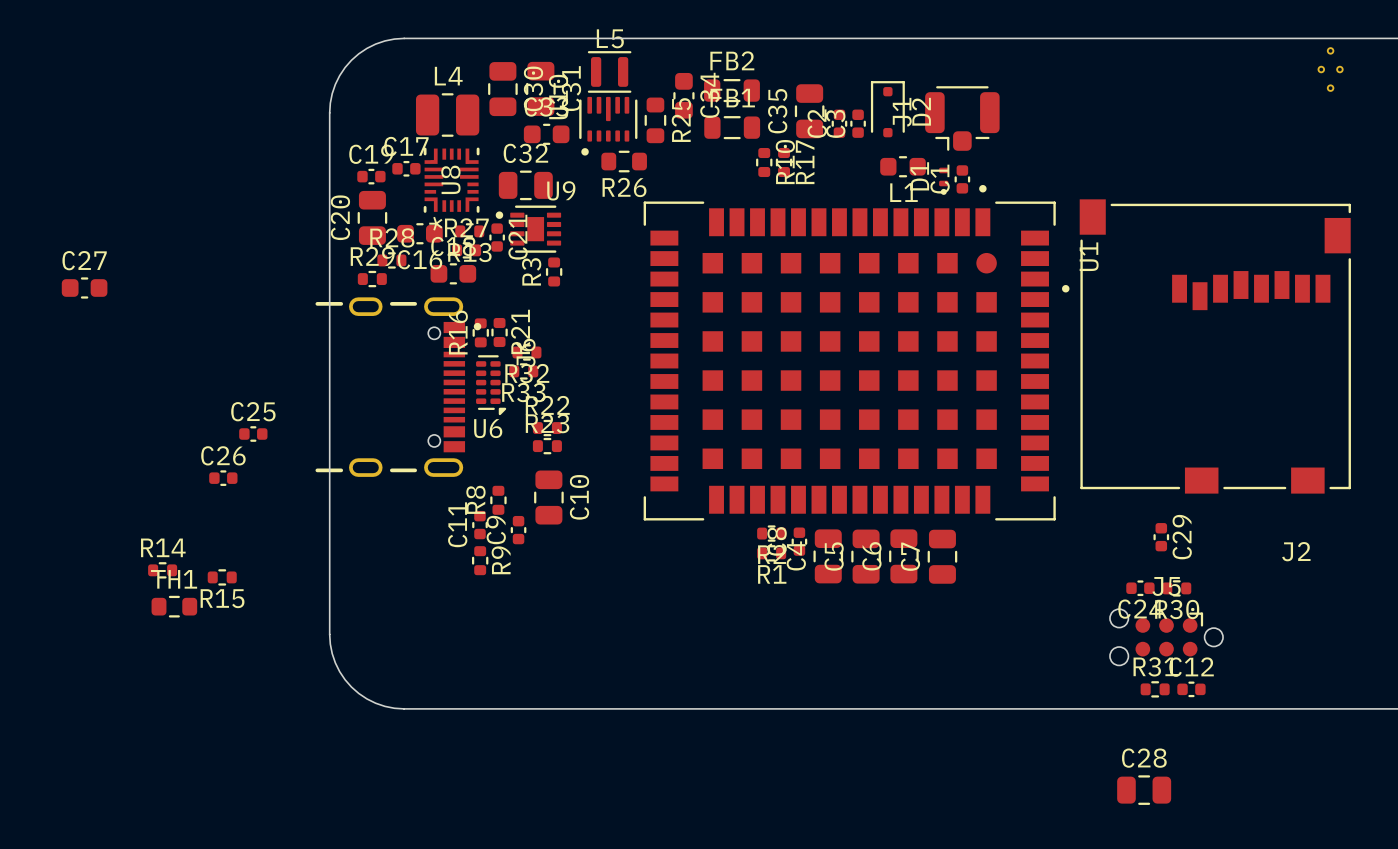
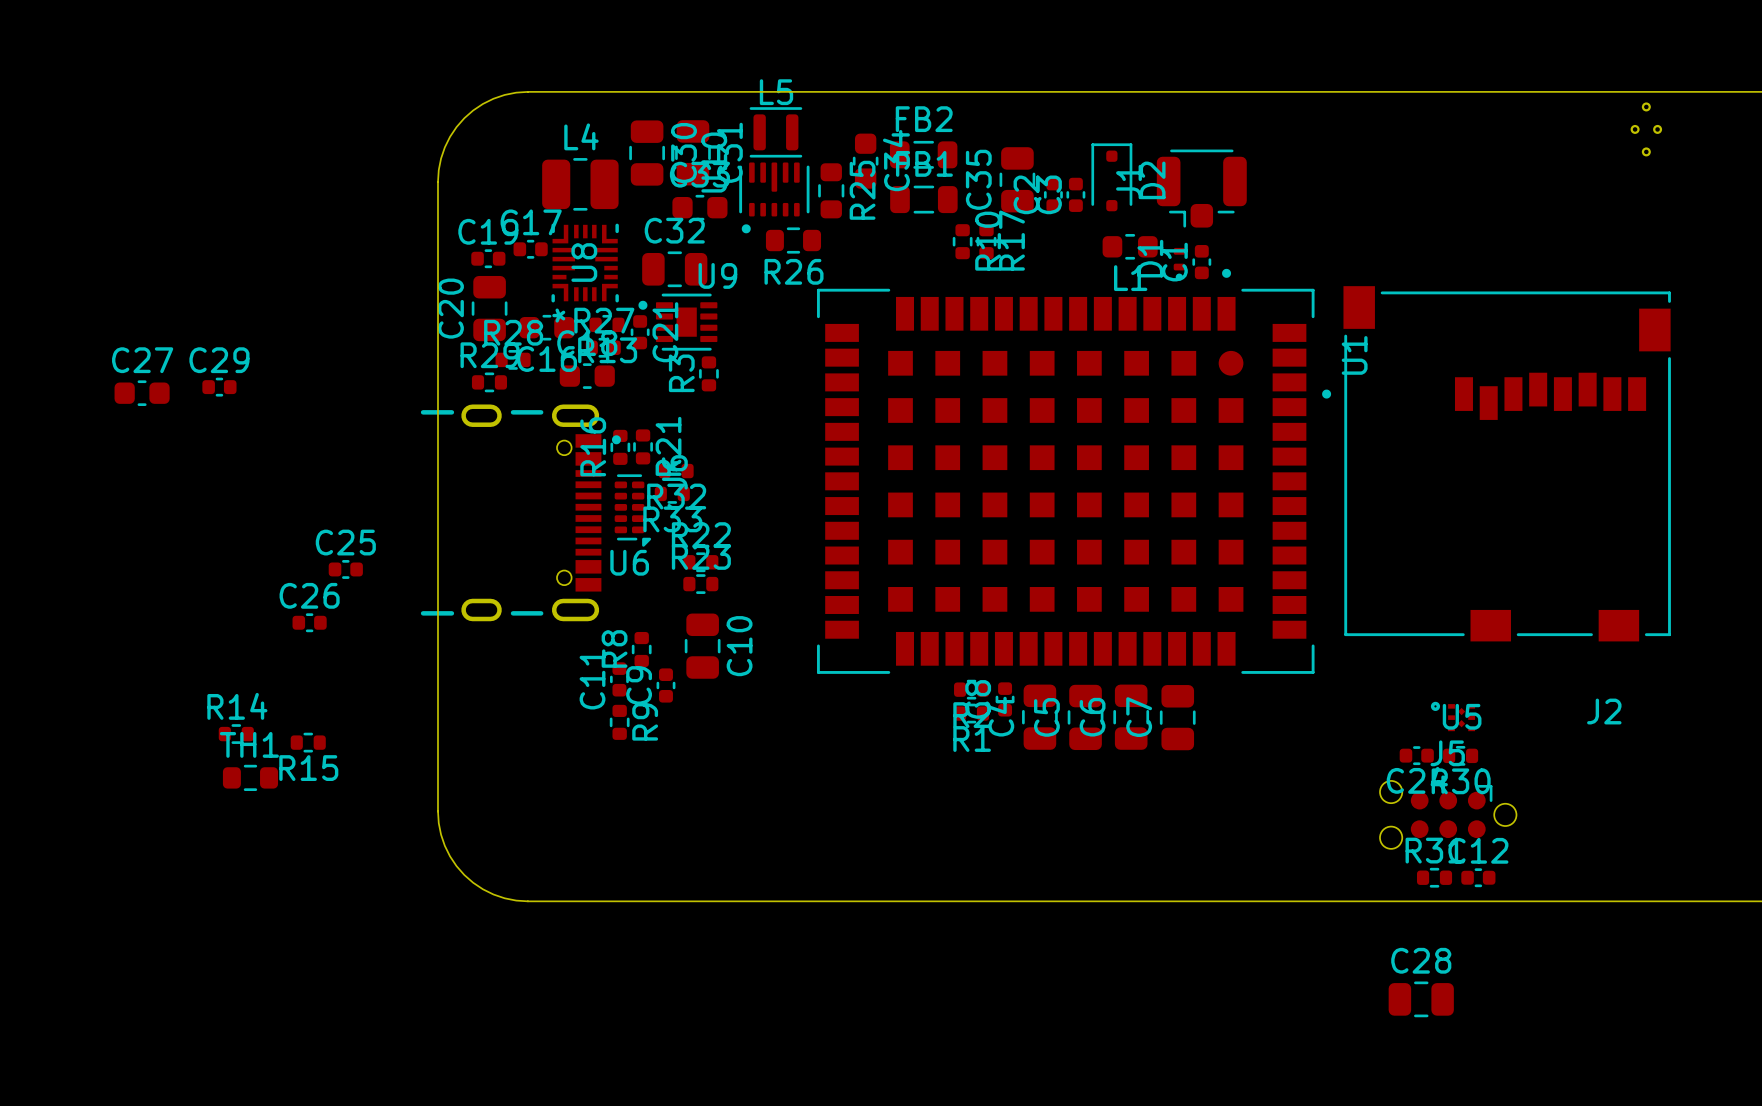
C29 rotation: 0° (1161, 537) -> 90° clockwise (219, 387)
C29 position: (1161, 537) -> (219, 387)
U5: none -> (1452, 716)

